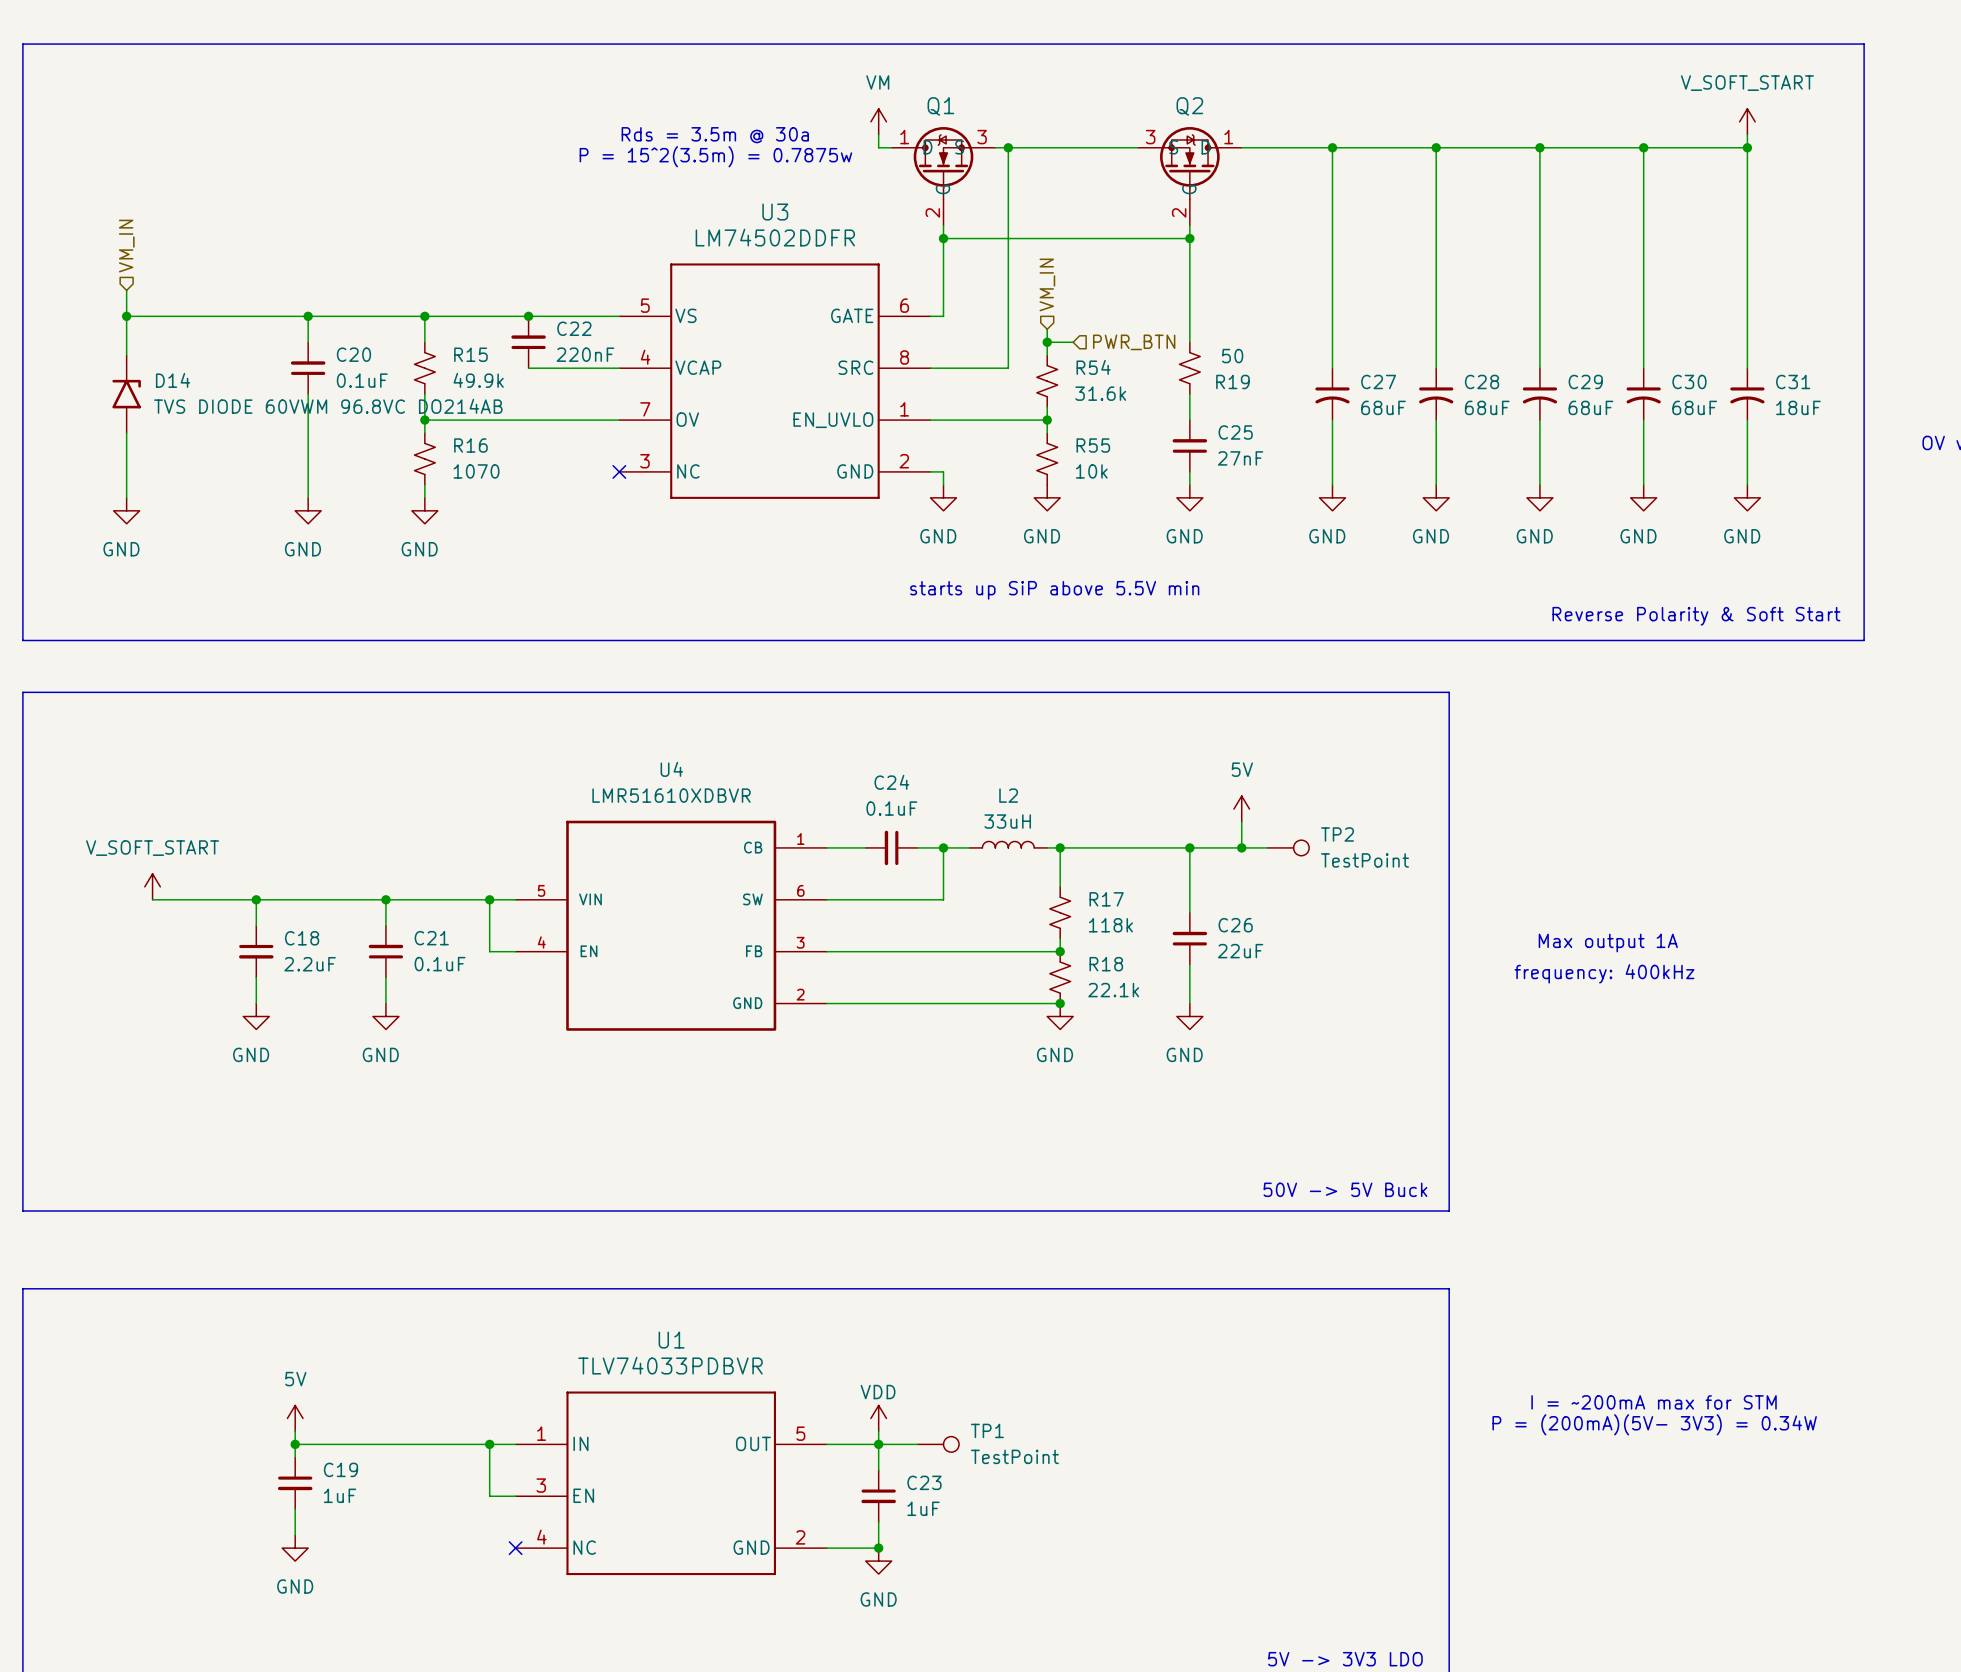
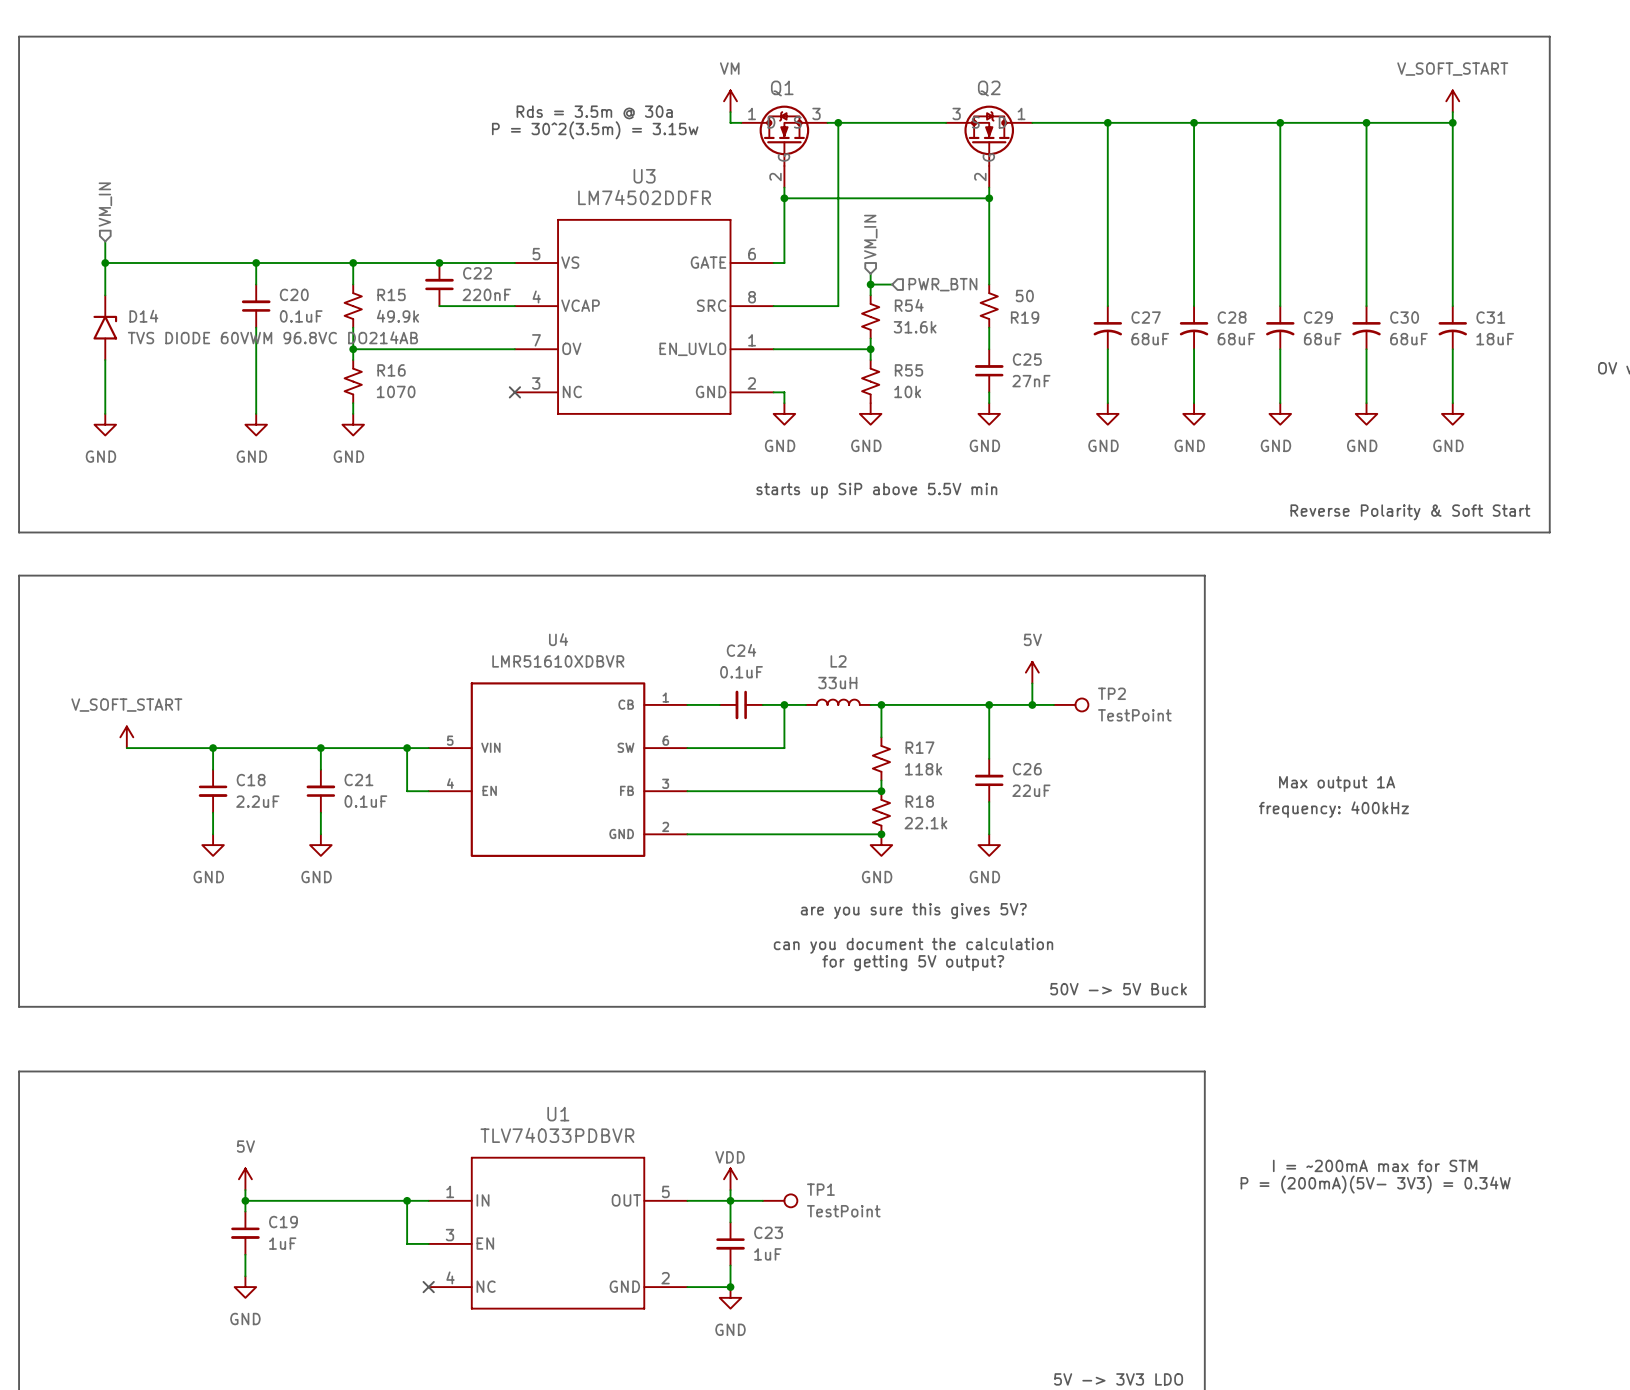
text: P = 15^2(3.5m) = 0.7875w (715, 156) -> P = 30^2(3.5m) = 3.15w (595, 130)
text: none -> are you sure this gives 5V? (913, 911)
text: none -> can you document the calculation (913, 945)
text: none -> for getting 5V output? (913, 963)

